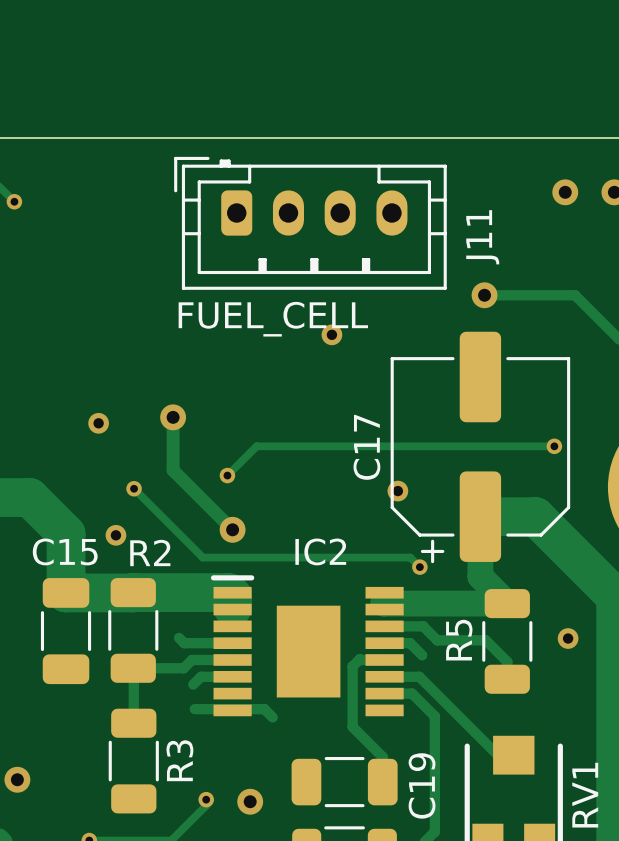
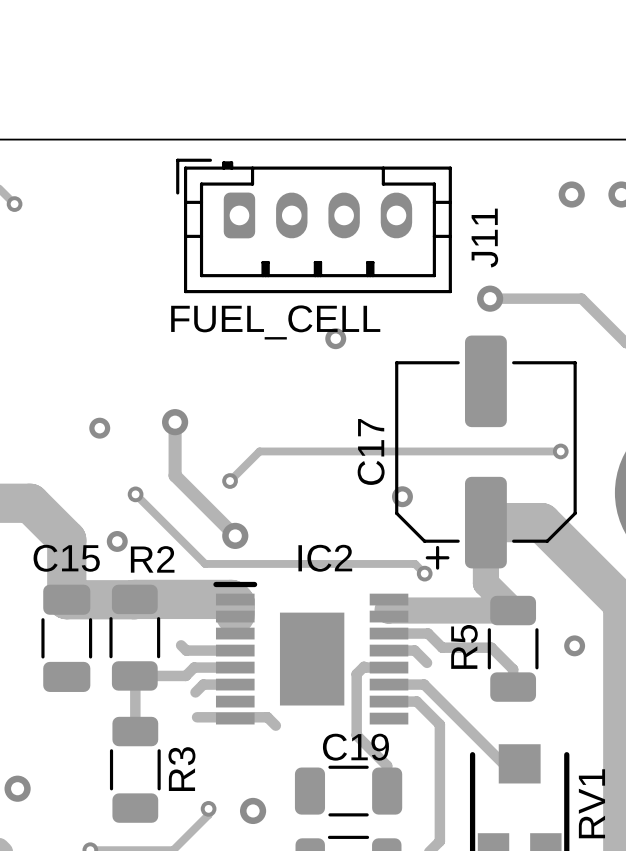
C19 name rotation: 0° (422, 785) -> 90° clockwise (355, 747)

